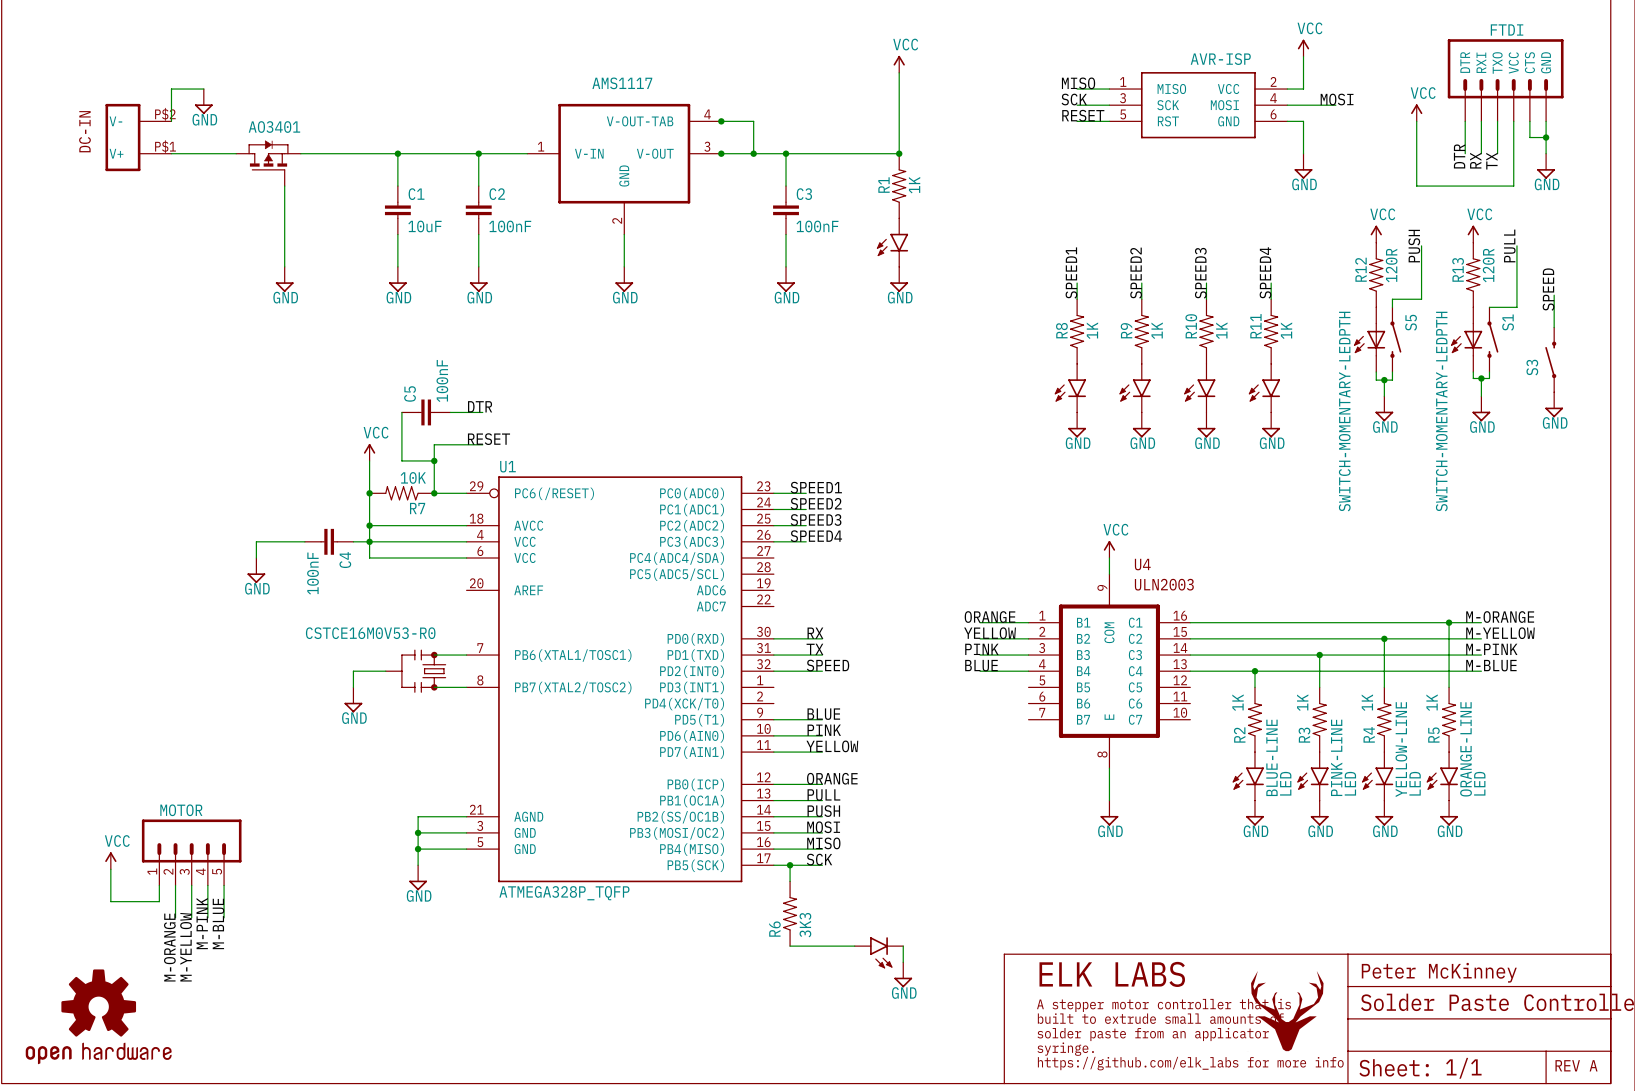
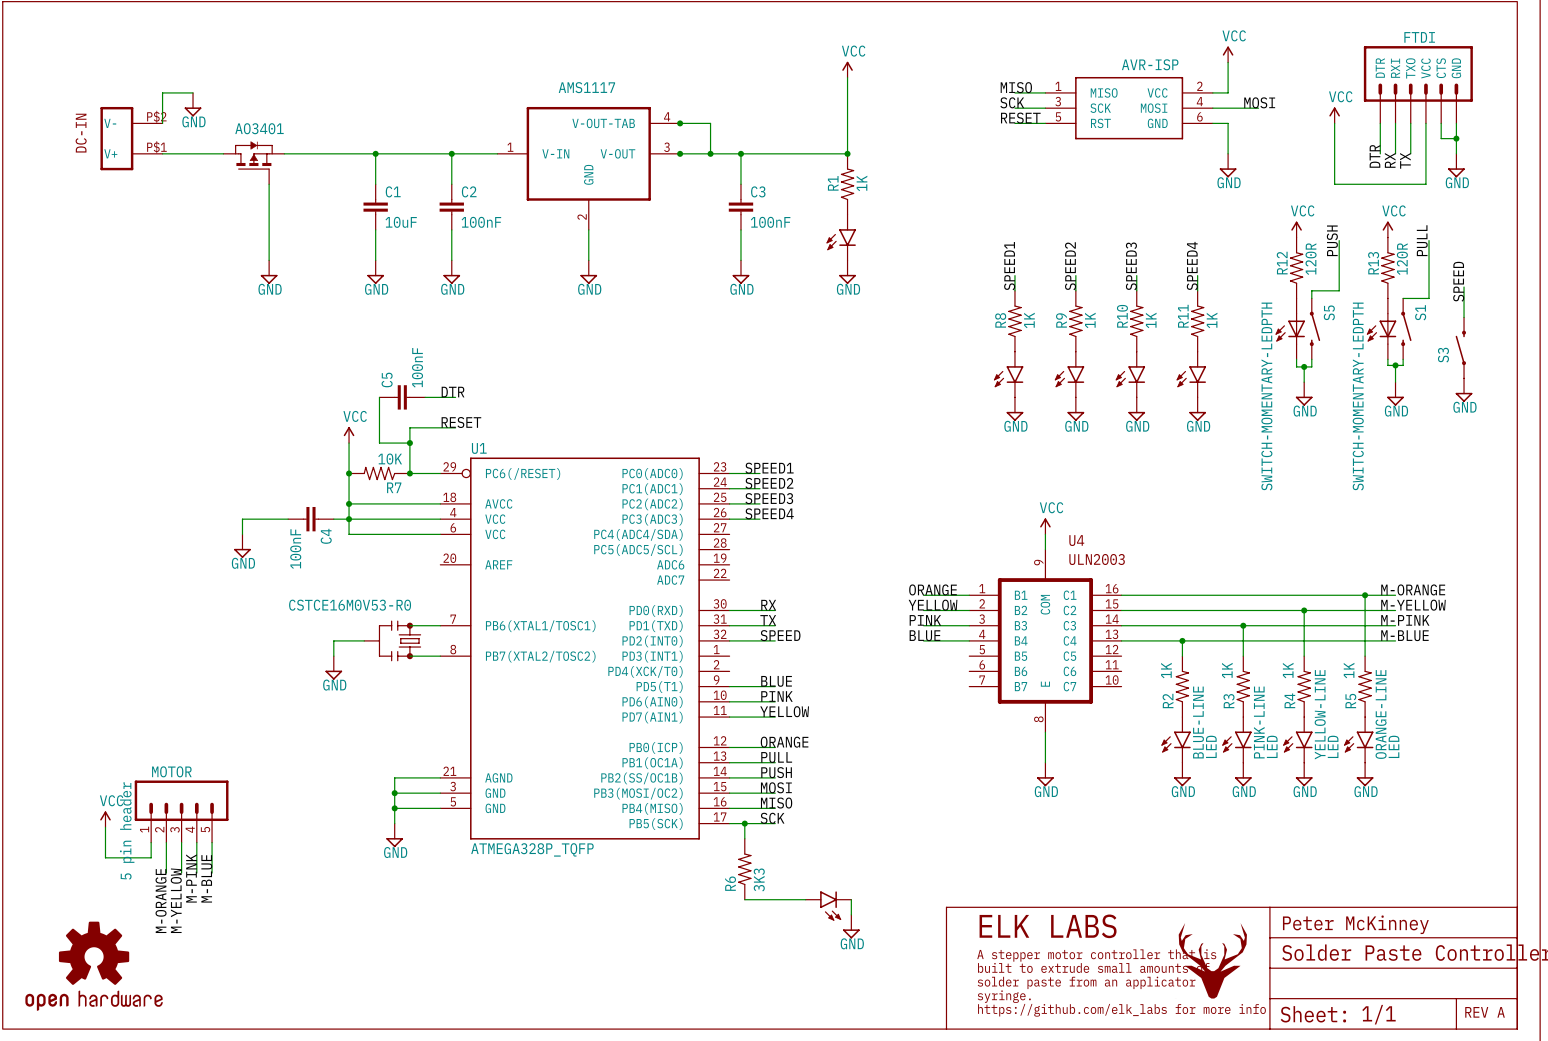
MOTOR value: none -> 5 pin header (127, 830)

